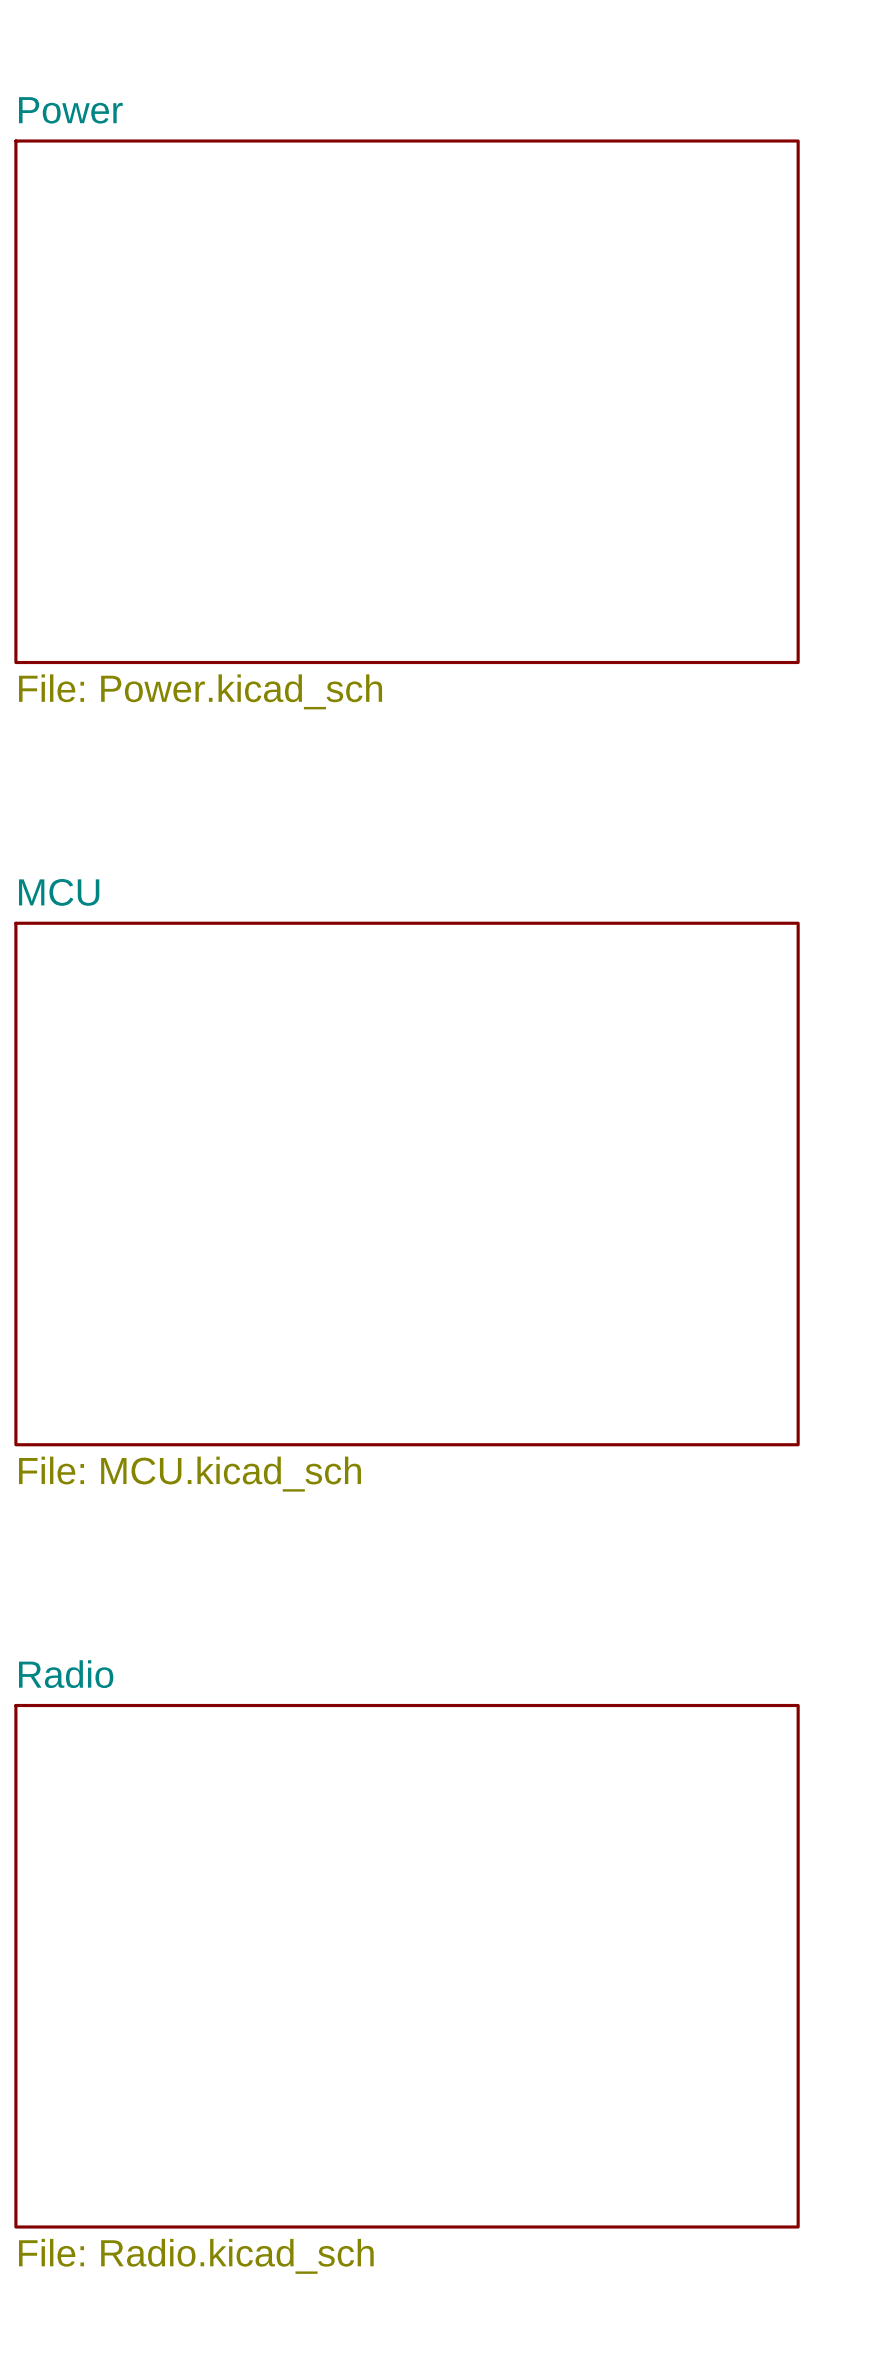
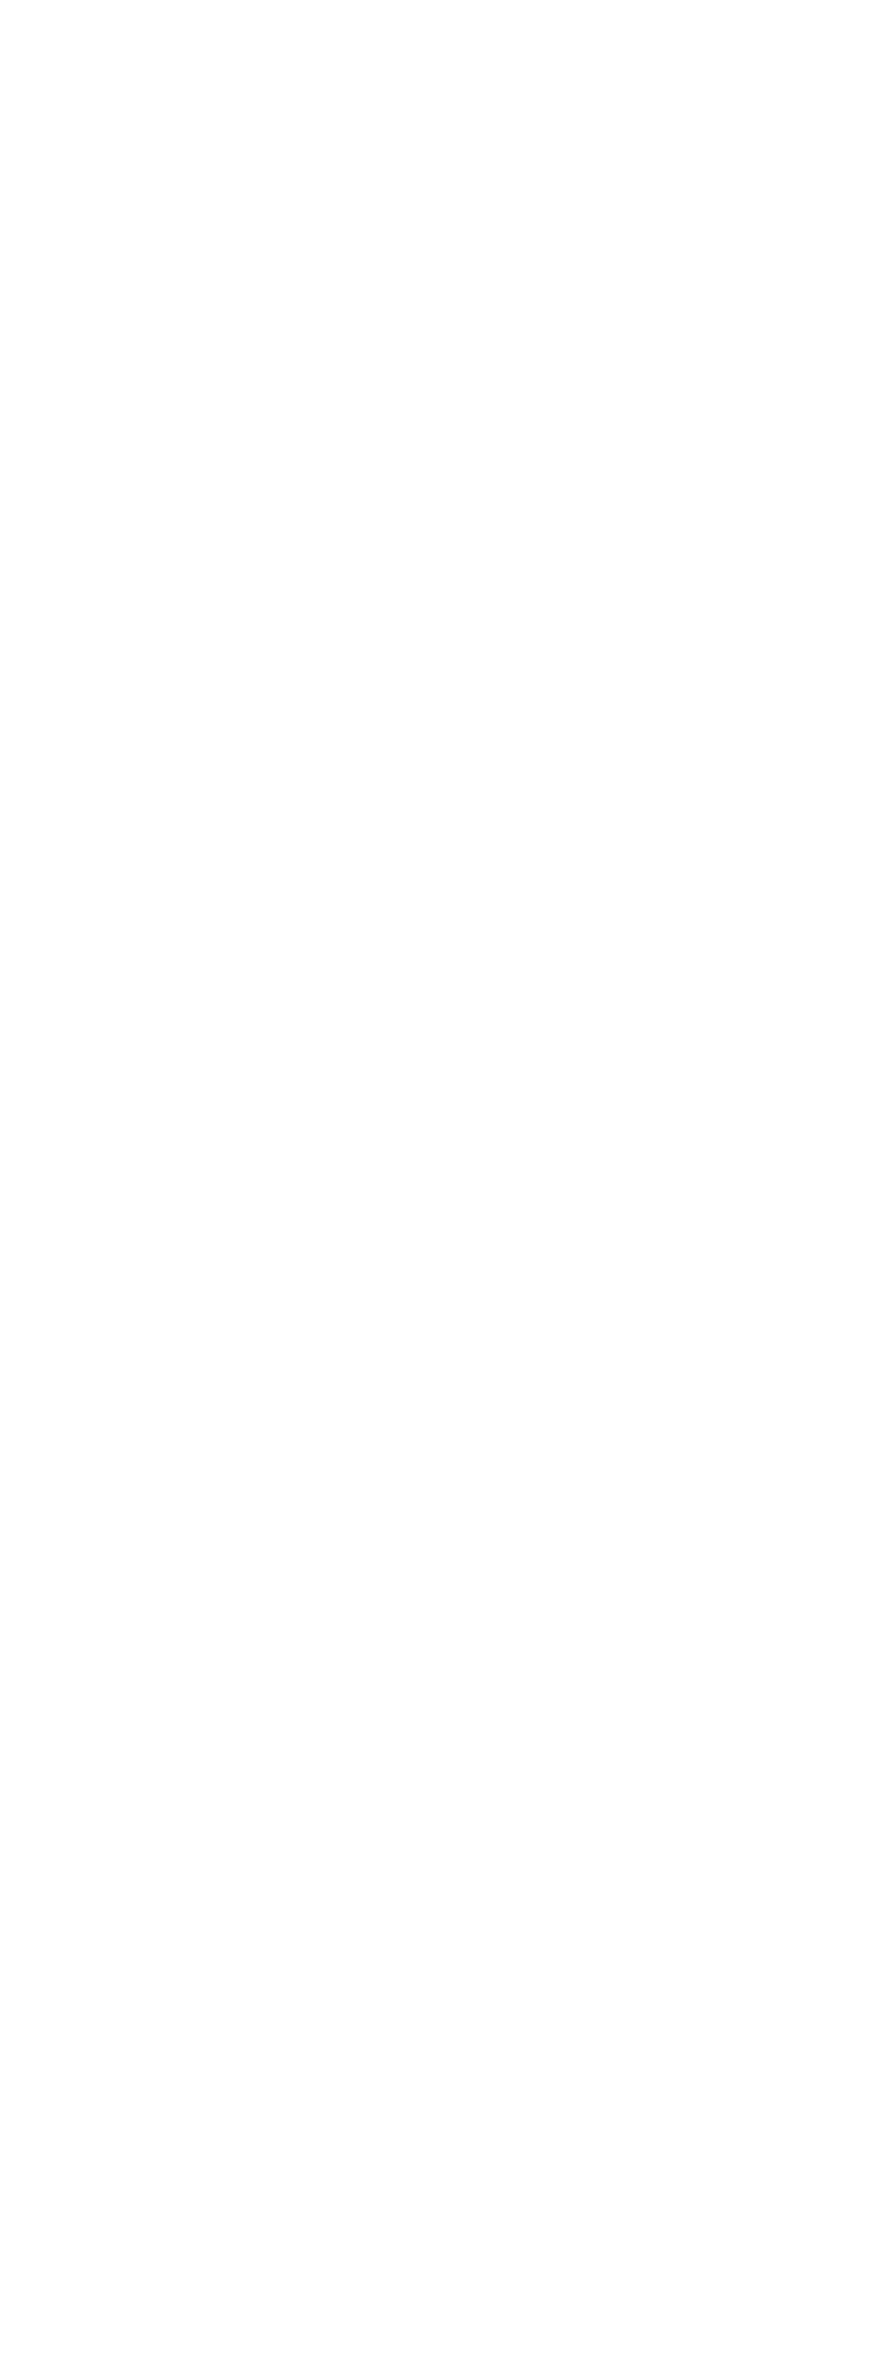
sheet Power: File: Power.kicad_sch (407, 401) -> none
sheet MCU: File: MCU.kicad_sch (407, 1184) -> none
sheet Radio: File: Radio.kicad_sch (407, 1966) -> none

